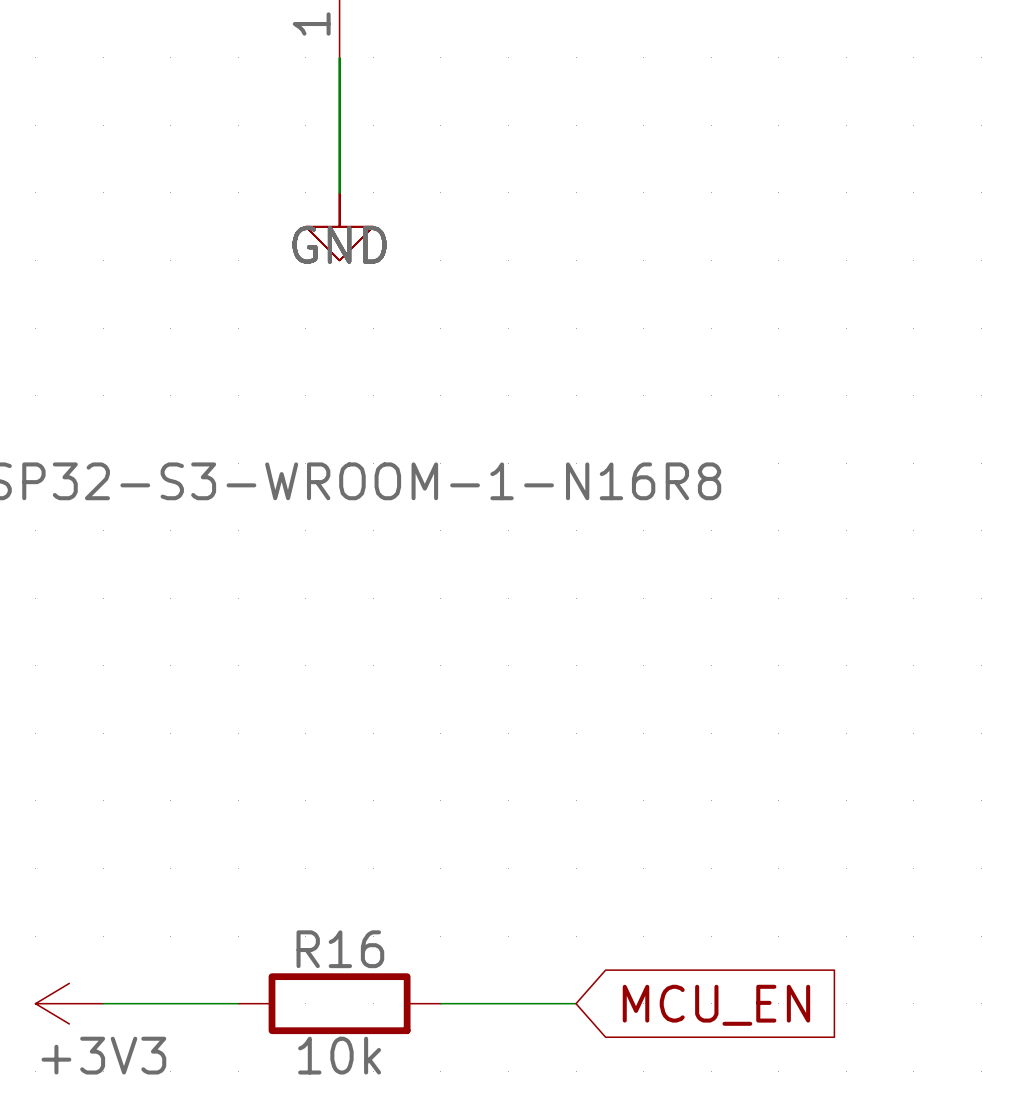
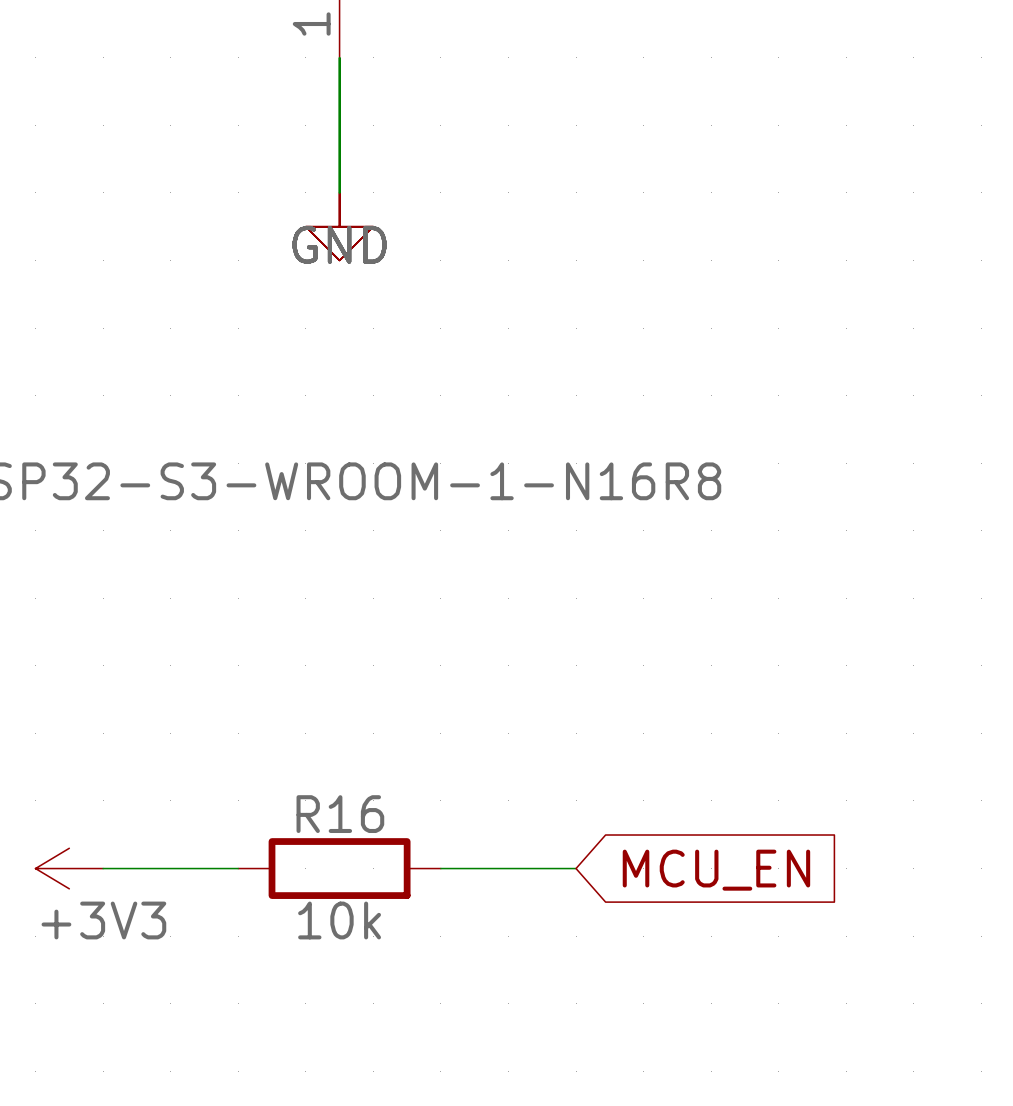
power symbol position: +3V3 (69, 1003) -> +3V3 (69, 868)
wire: (103, 1003) (238, 1003) -> (103, 868) (238, 868)
R16 position: (339, 1003) -> (339, 868)
wire: (440, 1003) (576, 1003) -> (440, 868) (576, 868)
global label position: MCU_EN (716, 1005) -> MCU_EN (716, 870)

